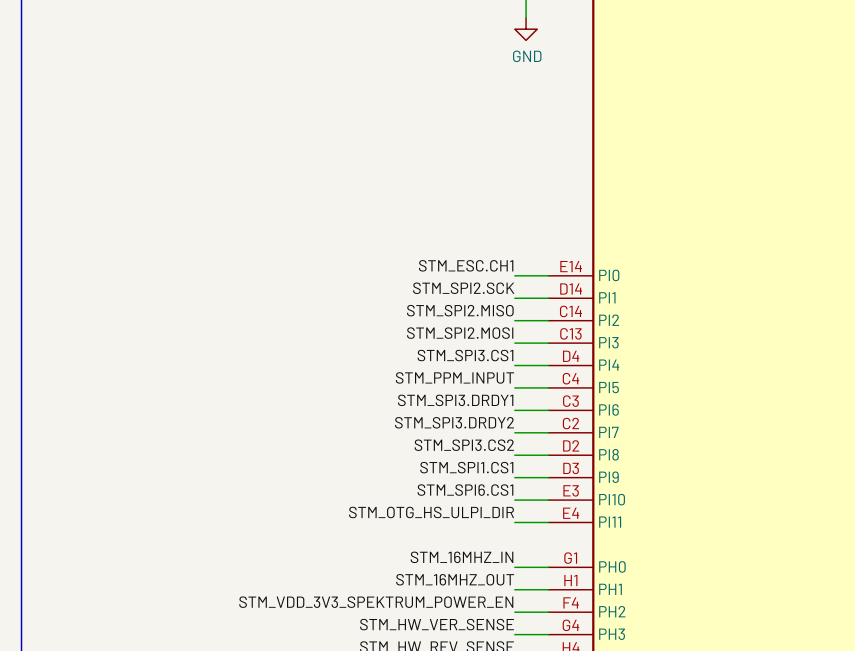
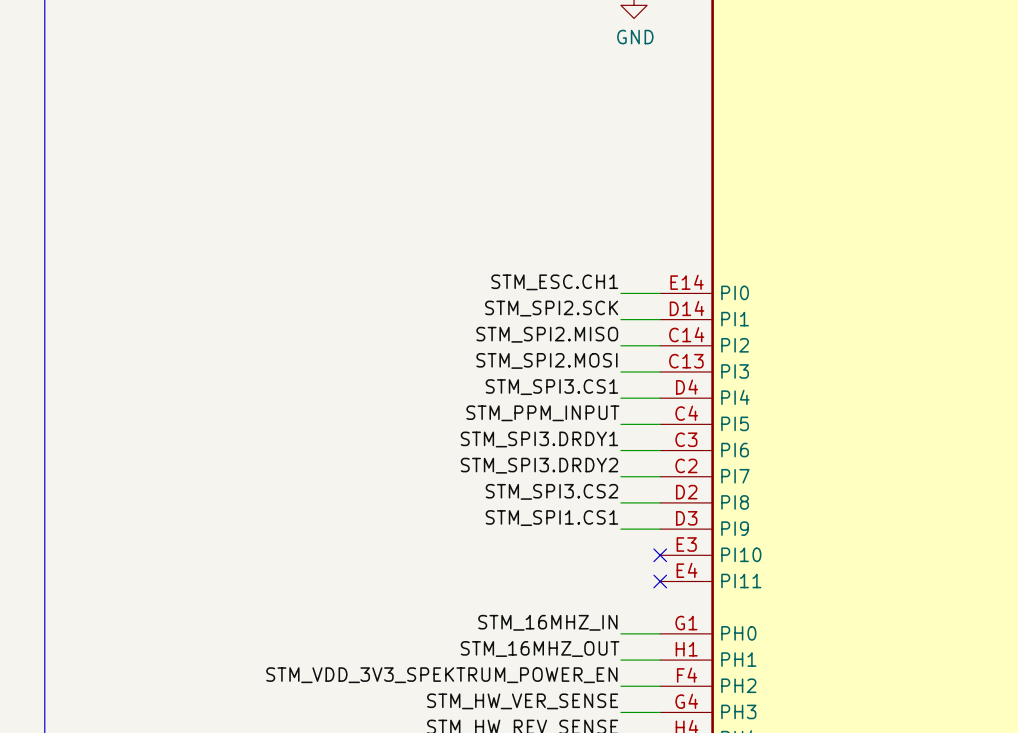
label: STM_SPI6.CS1 (465, 490) -> none
wire: (514, 500) (548, 500) -> none
no-connect mark: none -> (660, 555)
label: STM_OTG_HS_ULPI_DIR (431, 512) -> none
wire: (514, 522) (548, 522) -> none
no-connect mark: none -> (660, 581)

